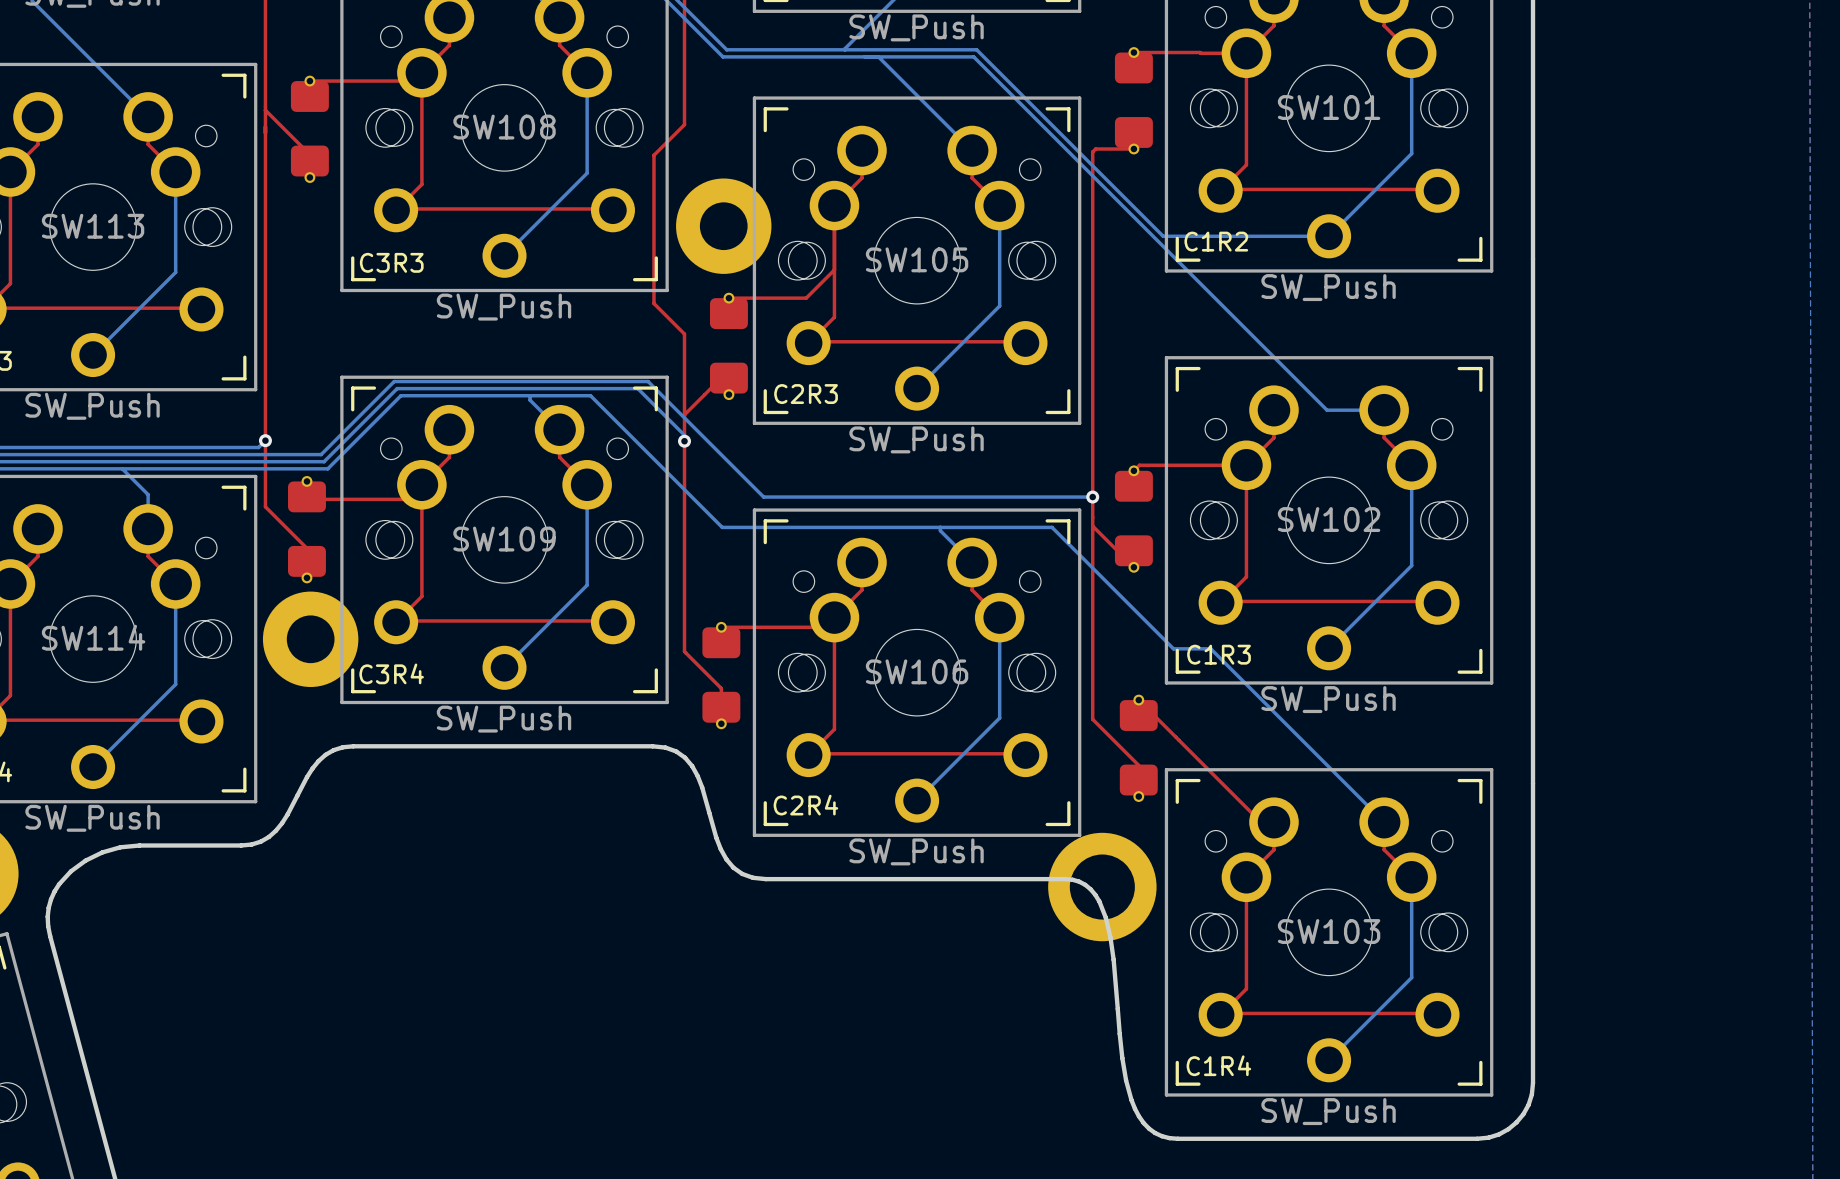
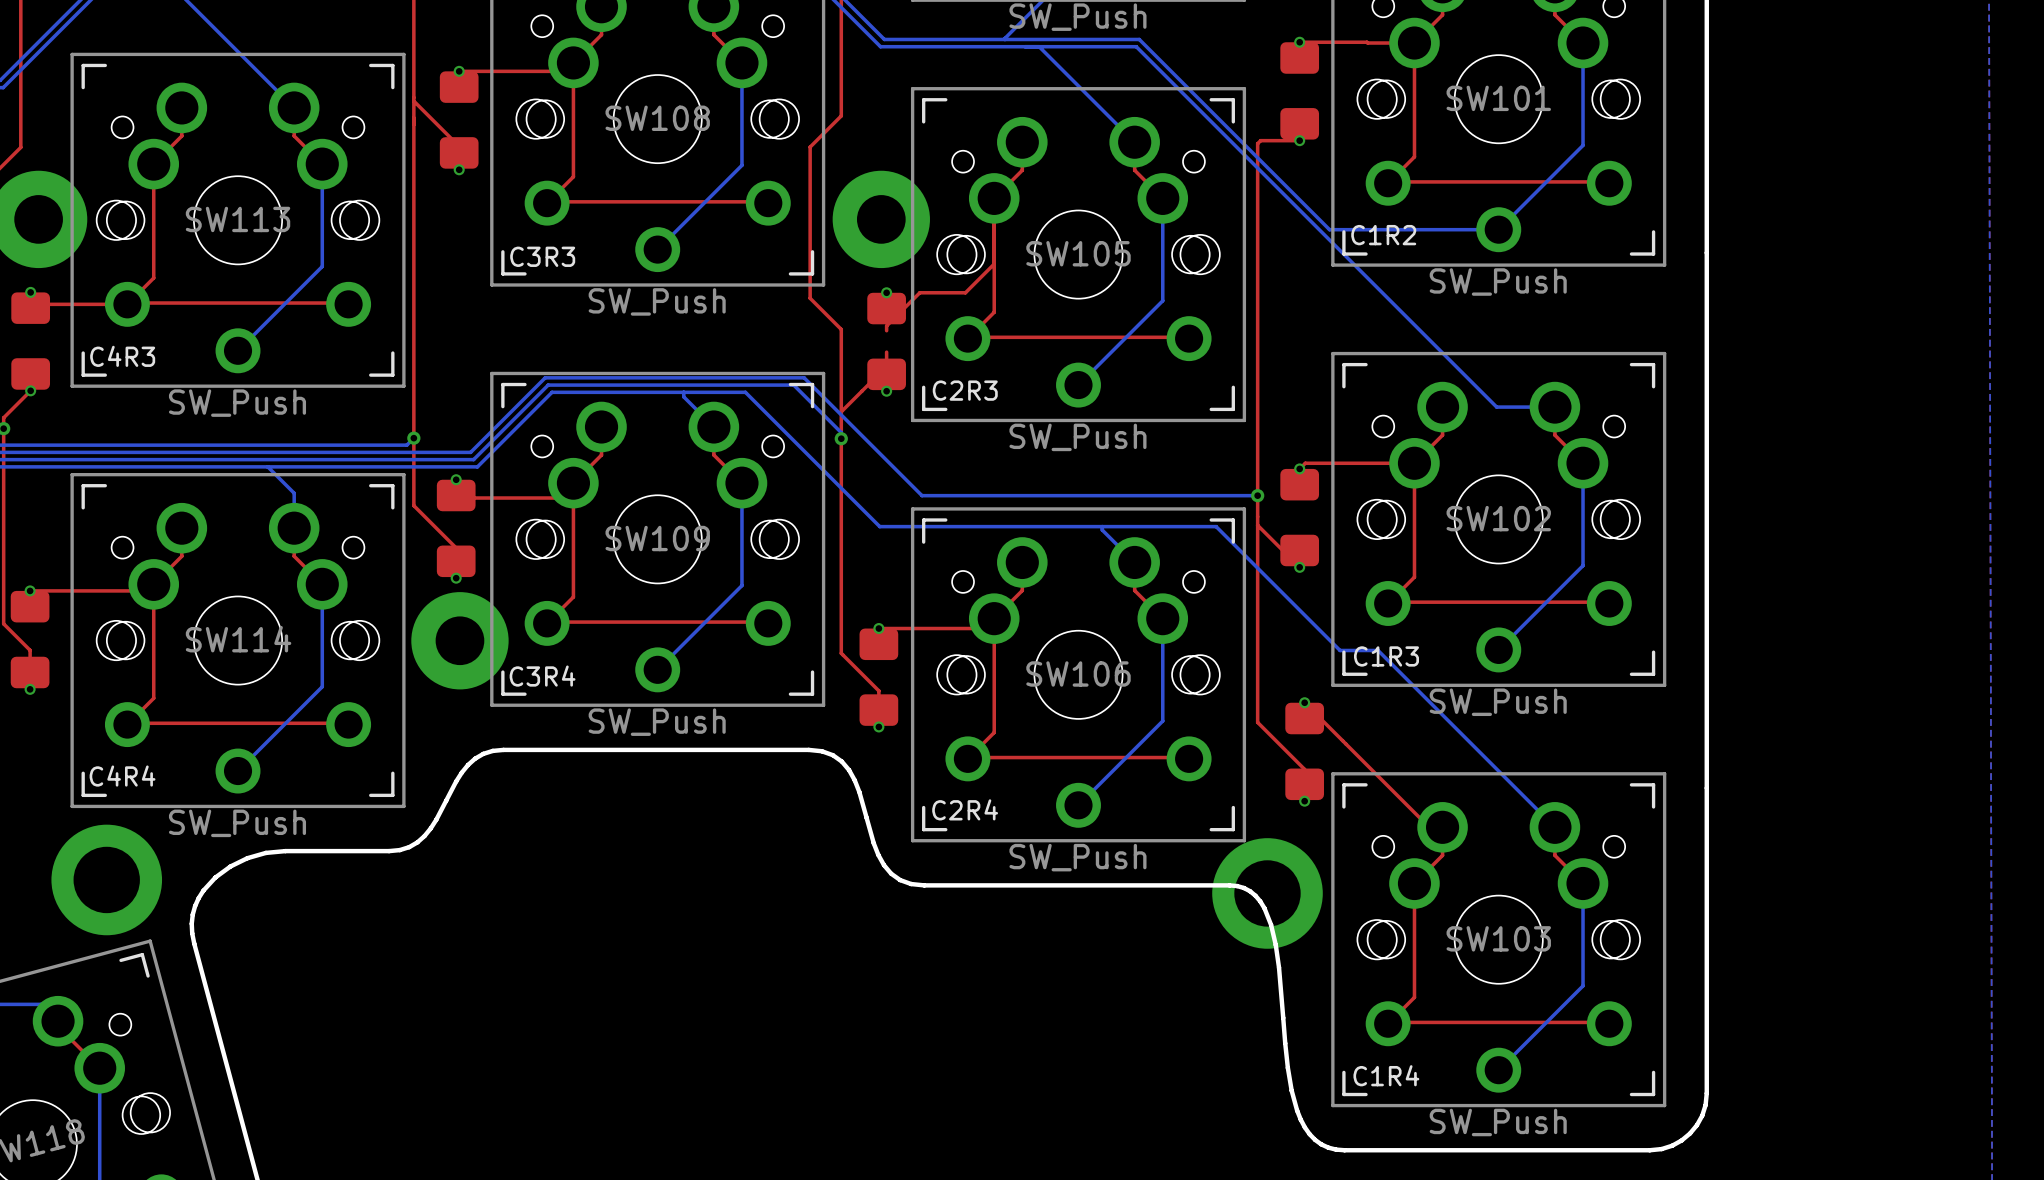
top track: (761, 298) (728, 298) -> (919, 292) (886, 325) (886, 330)
top track: none -> (886, 352) (886, 366)

